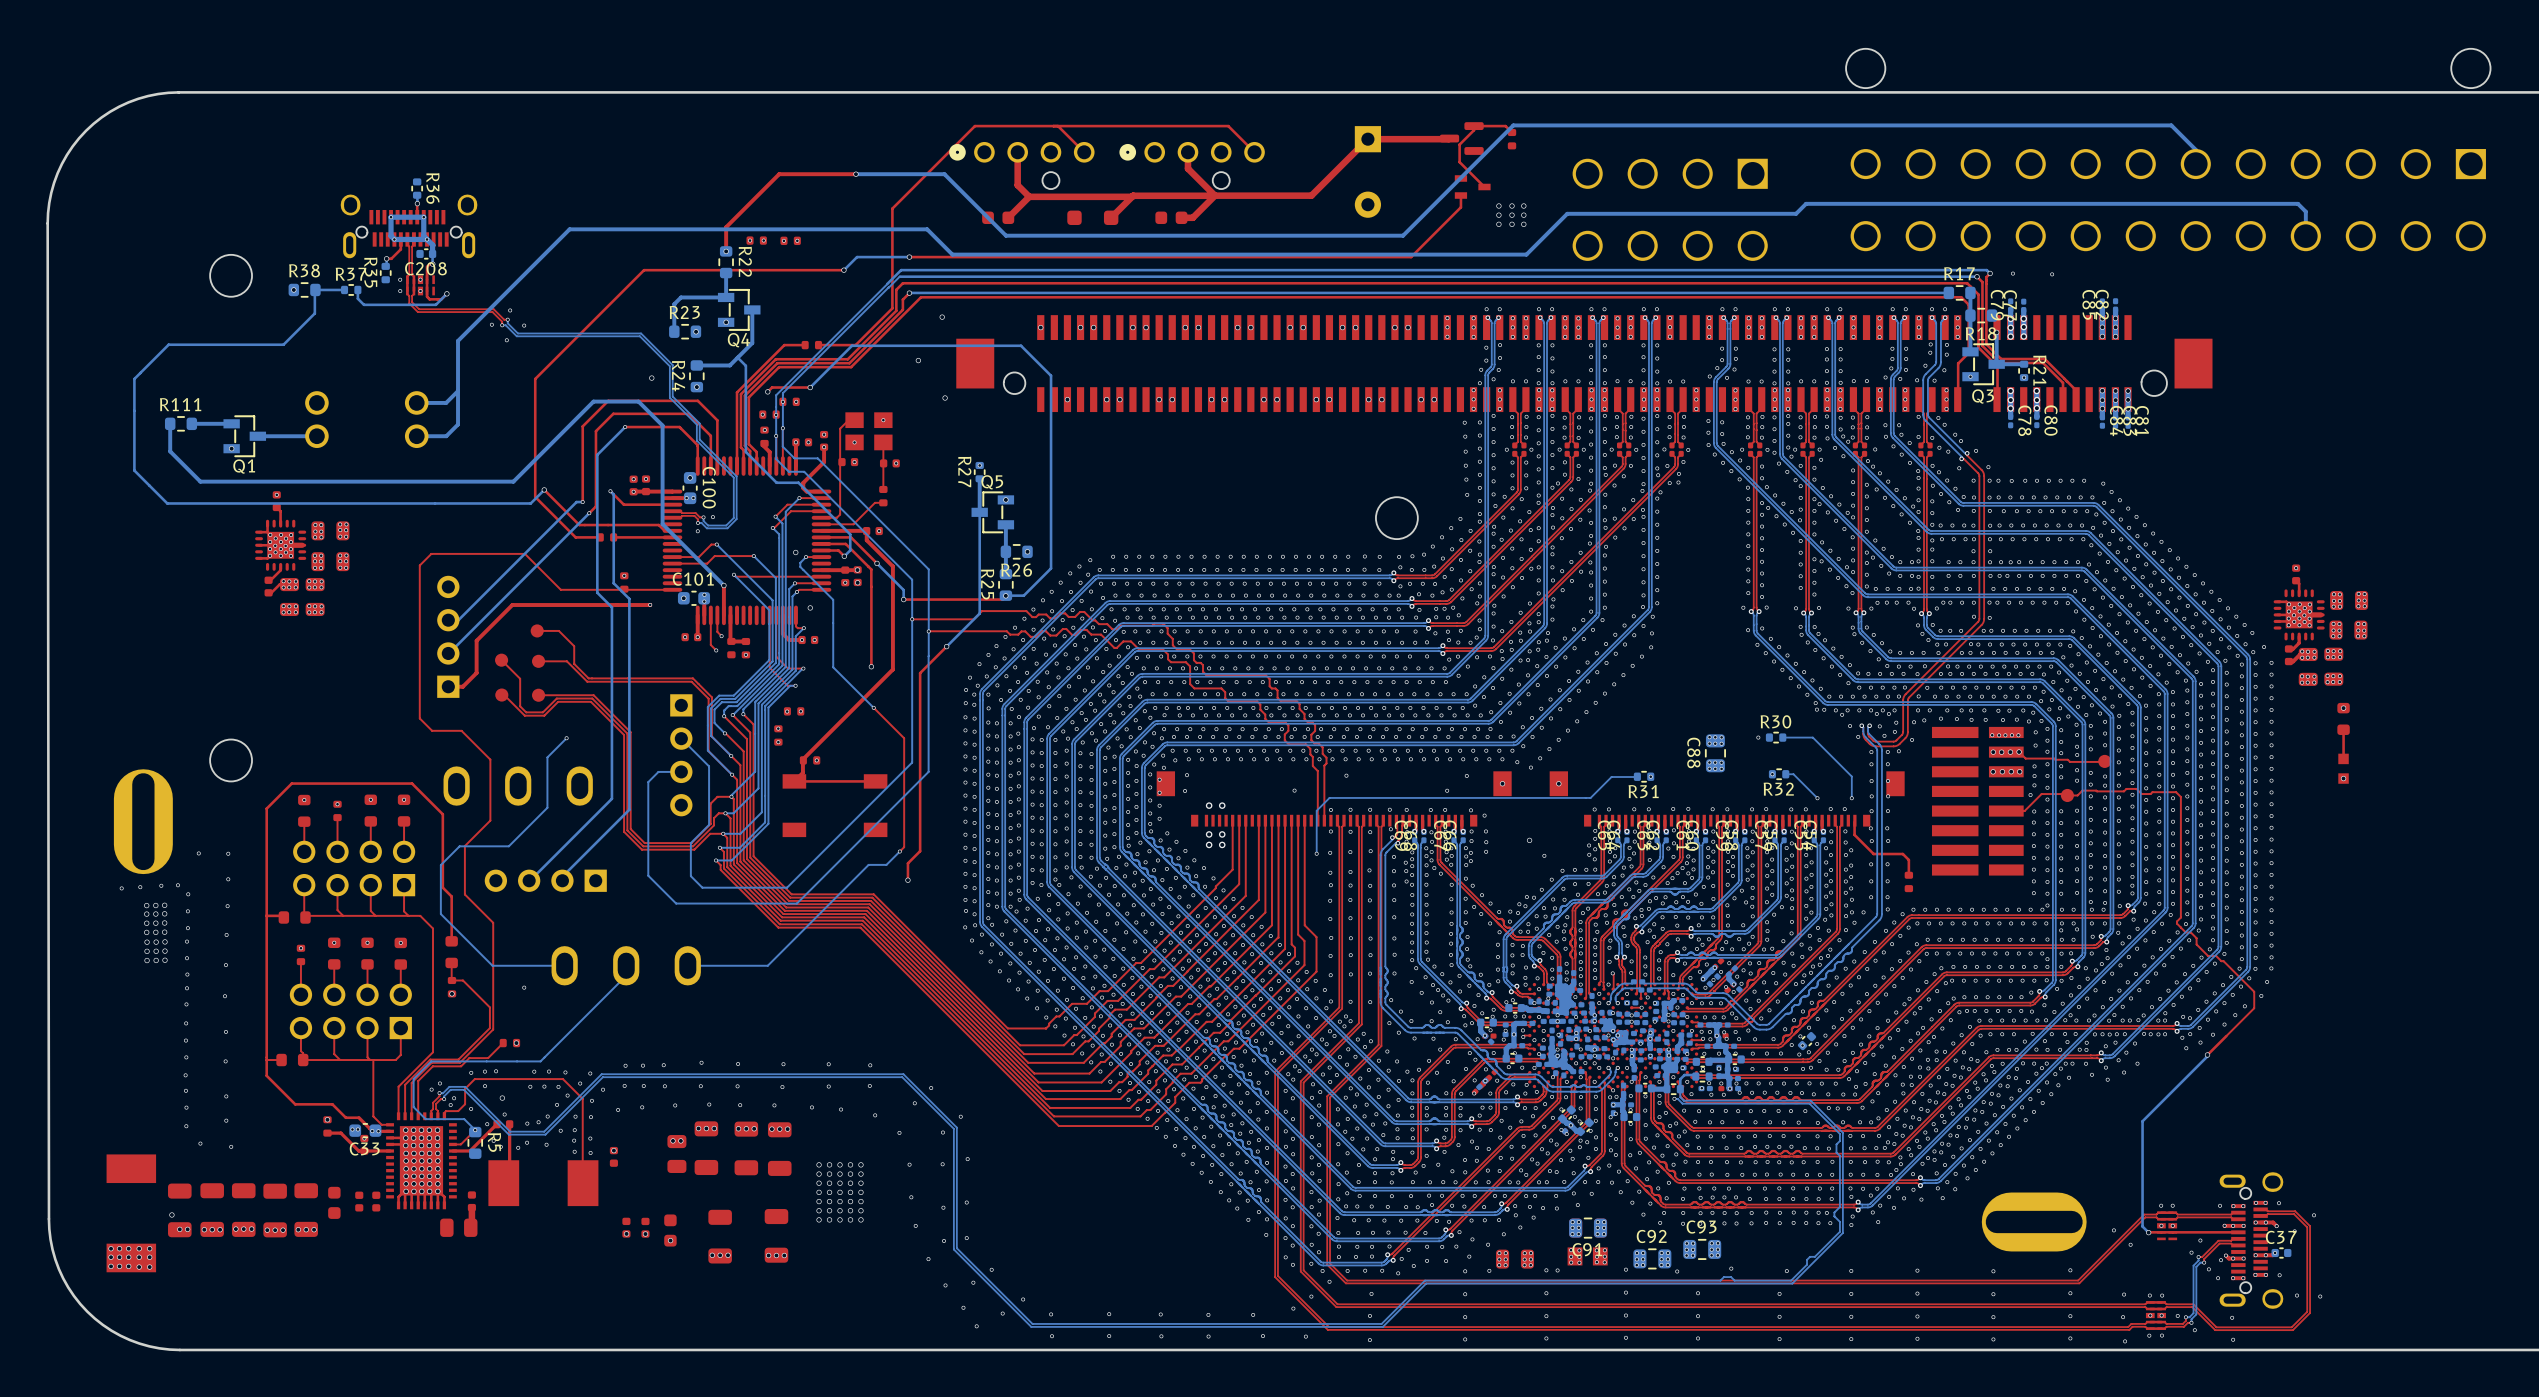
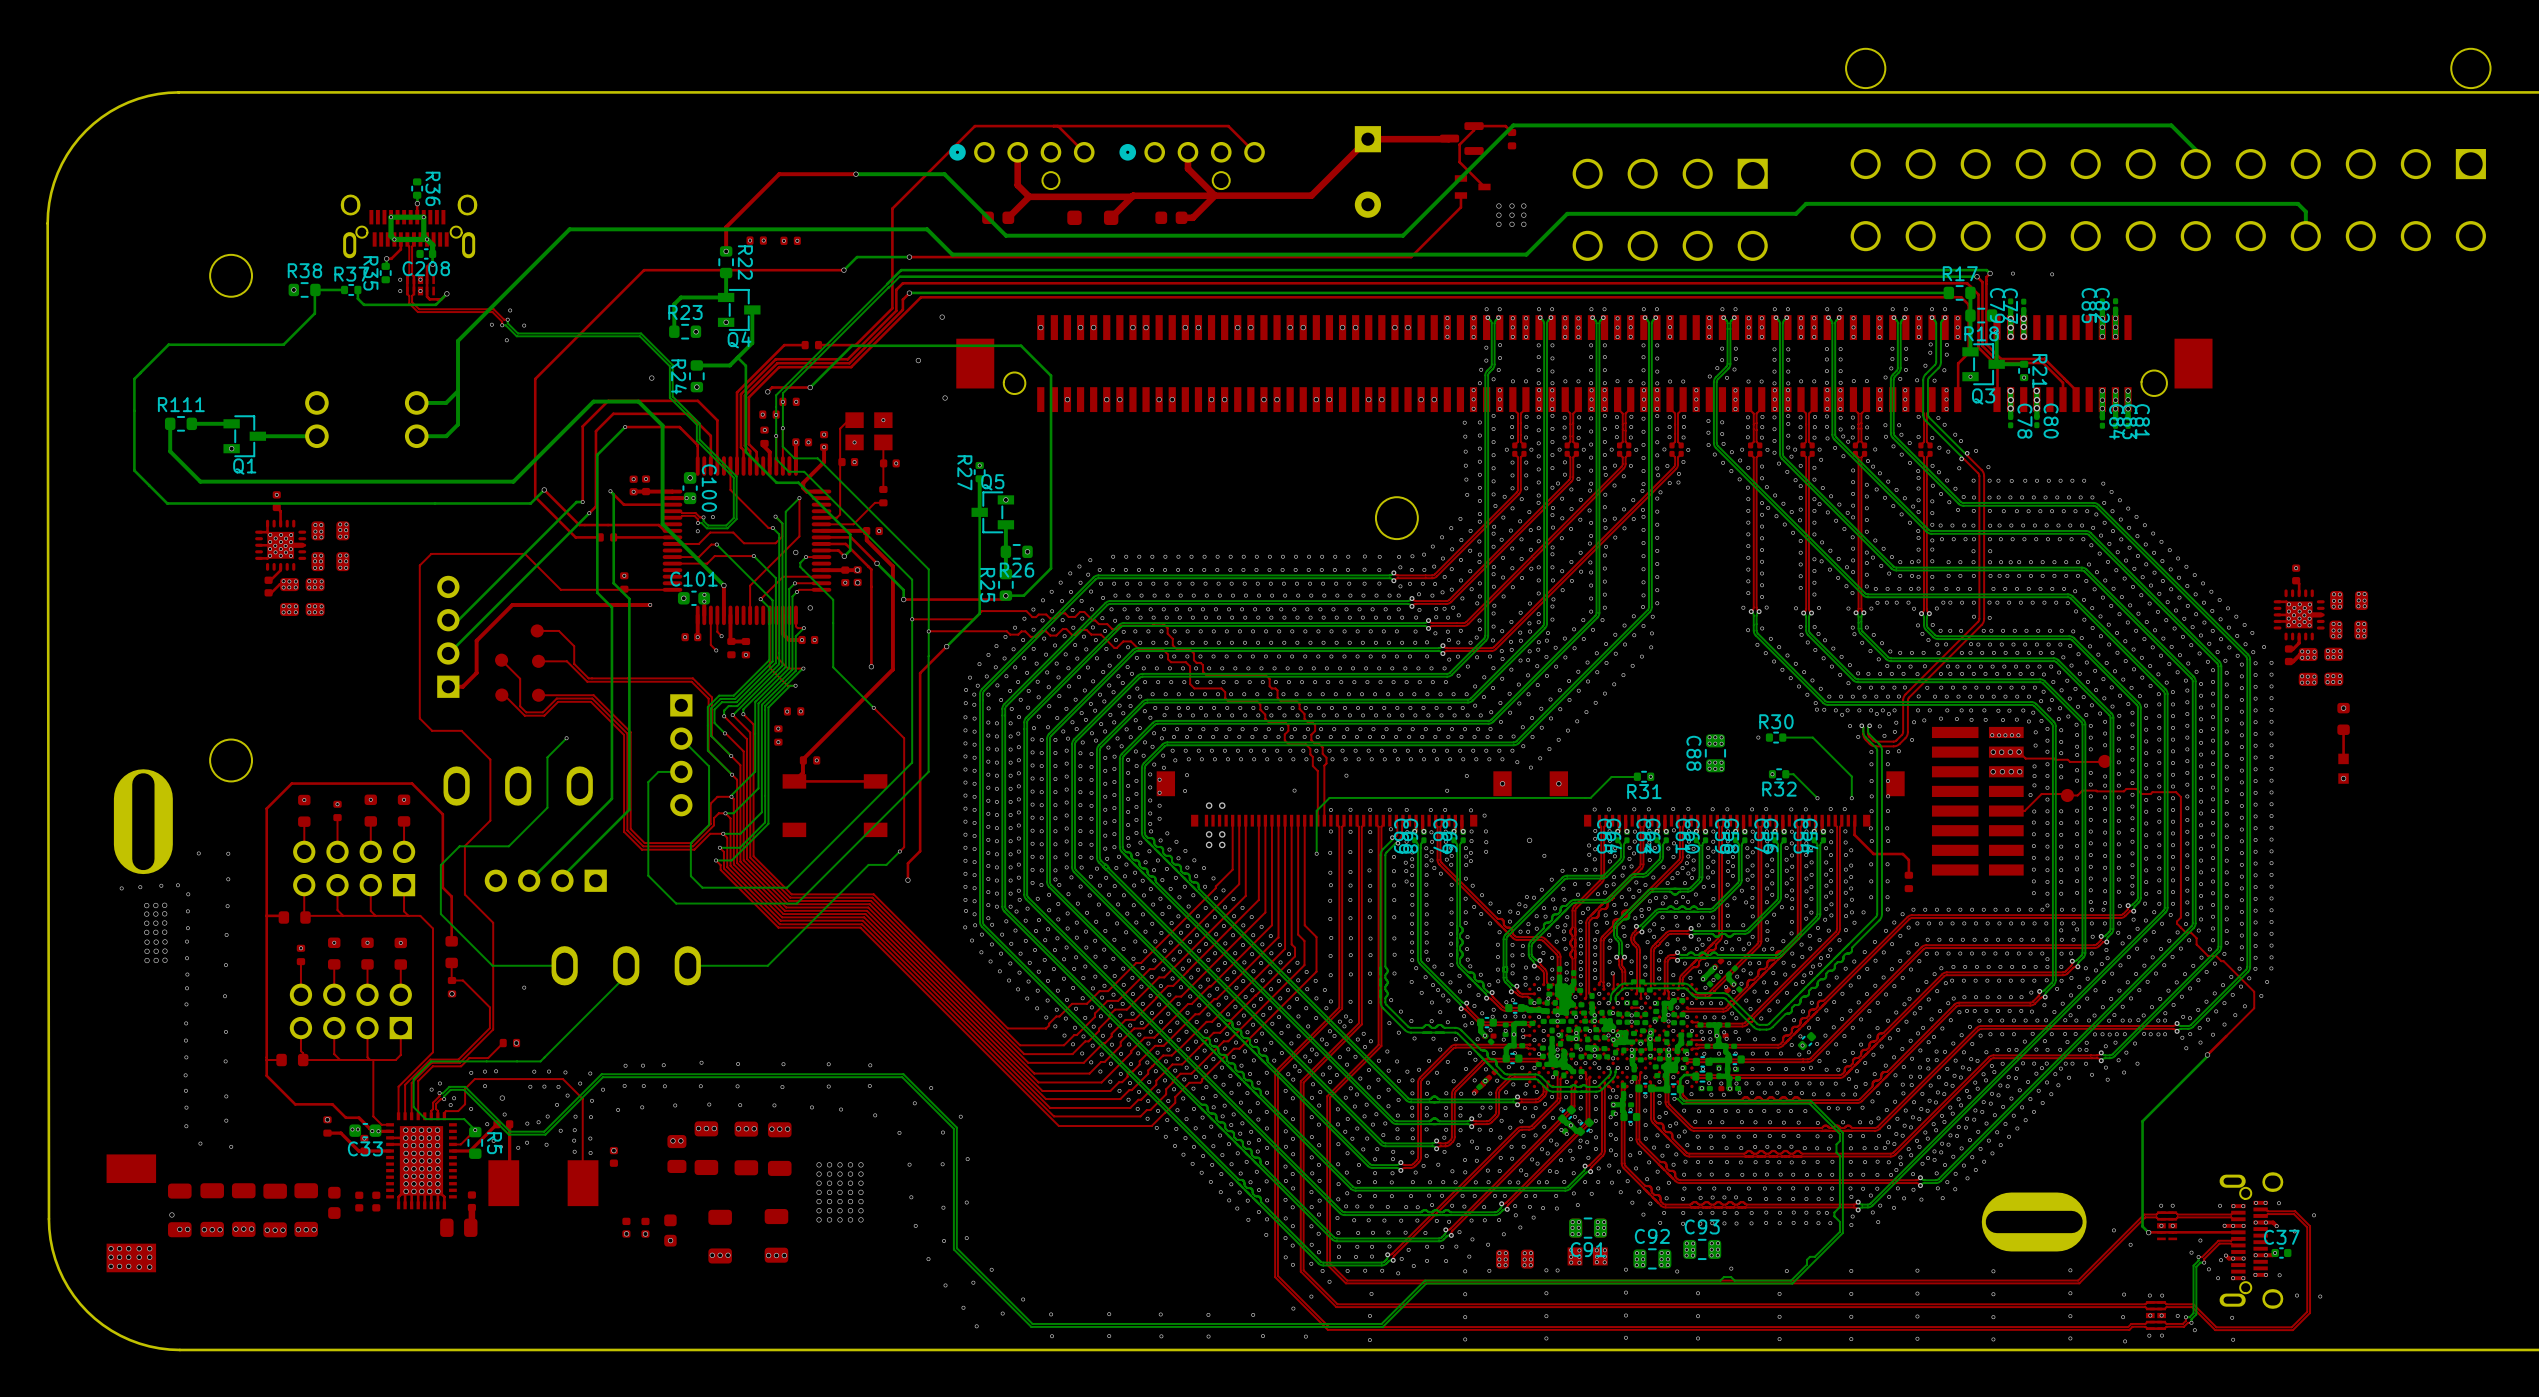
top track: (821, 498) (799, 498) -> (750, 615) (750, 585) (799, 536) (799, 498)
top track: (821, 504) (787, 504) (775, 516) -> (672, 543) (698, 543) (710, 532) (733, 532) (743, 543) (775, 543) (782, 536) (782, 523) (775, 516)
top track: (821, 511) (791, 511) (772, 527) -> (730, 466) (730, 489) (768, 527) (772, 527)
top track: (733, 574) (735, 576) (783, 576) -> (760, 599) (783, 576)
bottom track: (733, 574) (769, 610) -> (760, 599) (769, 610)
via position: (733, 574) -> (760, 599)

